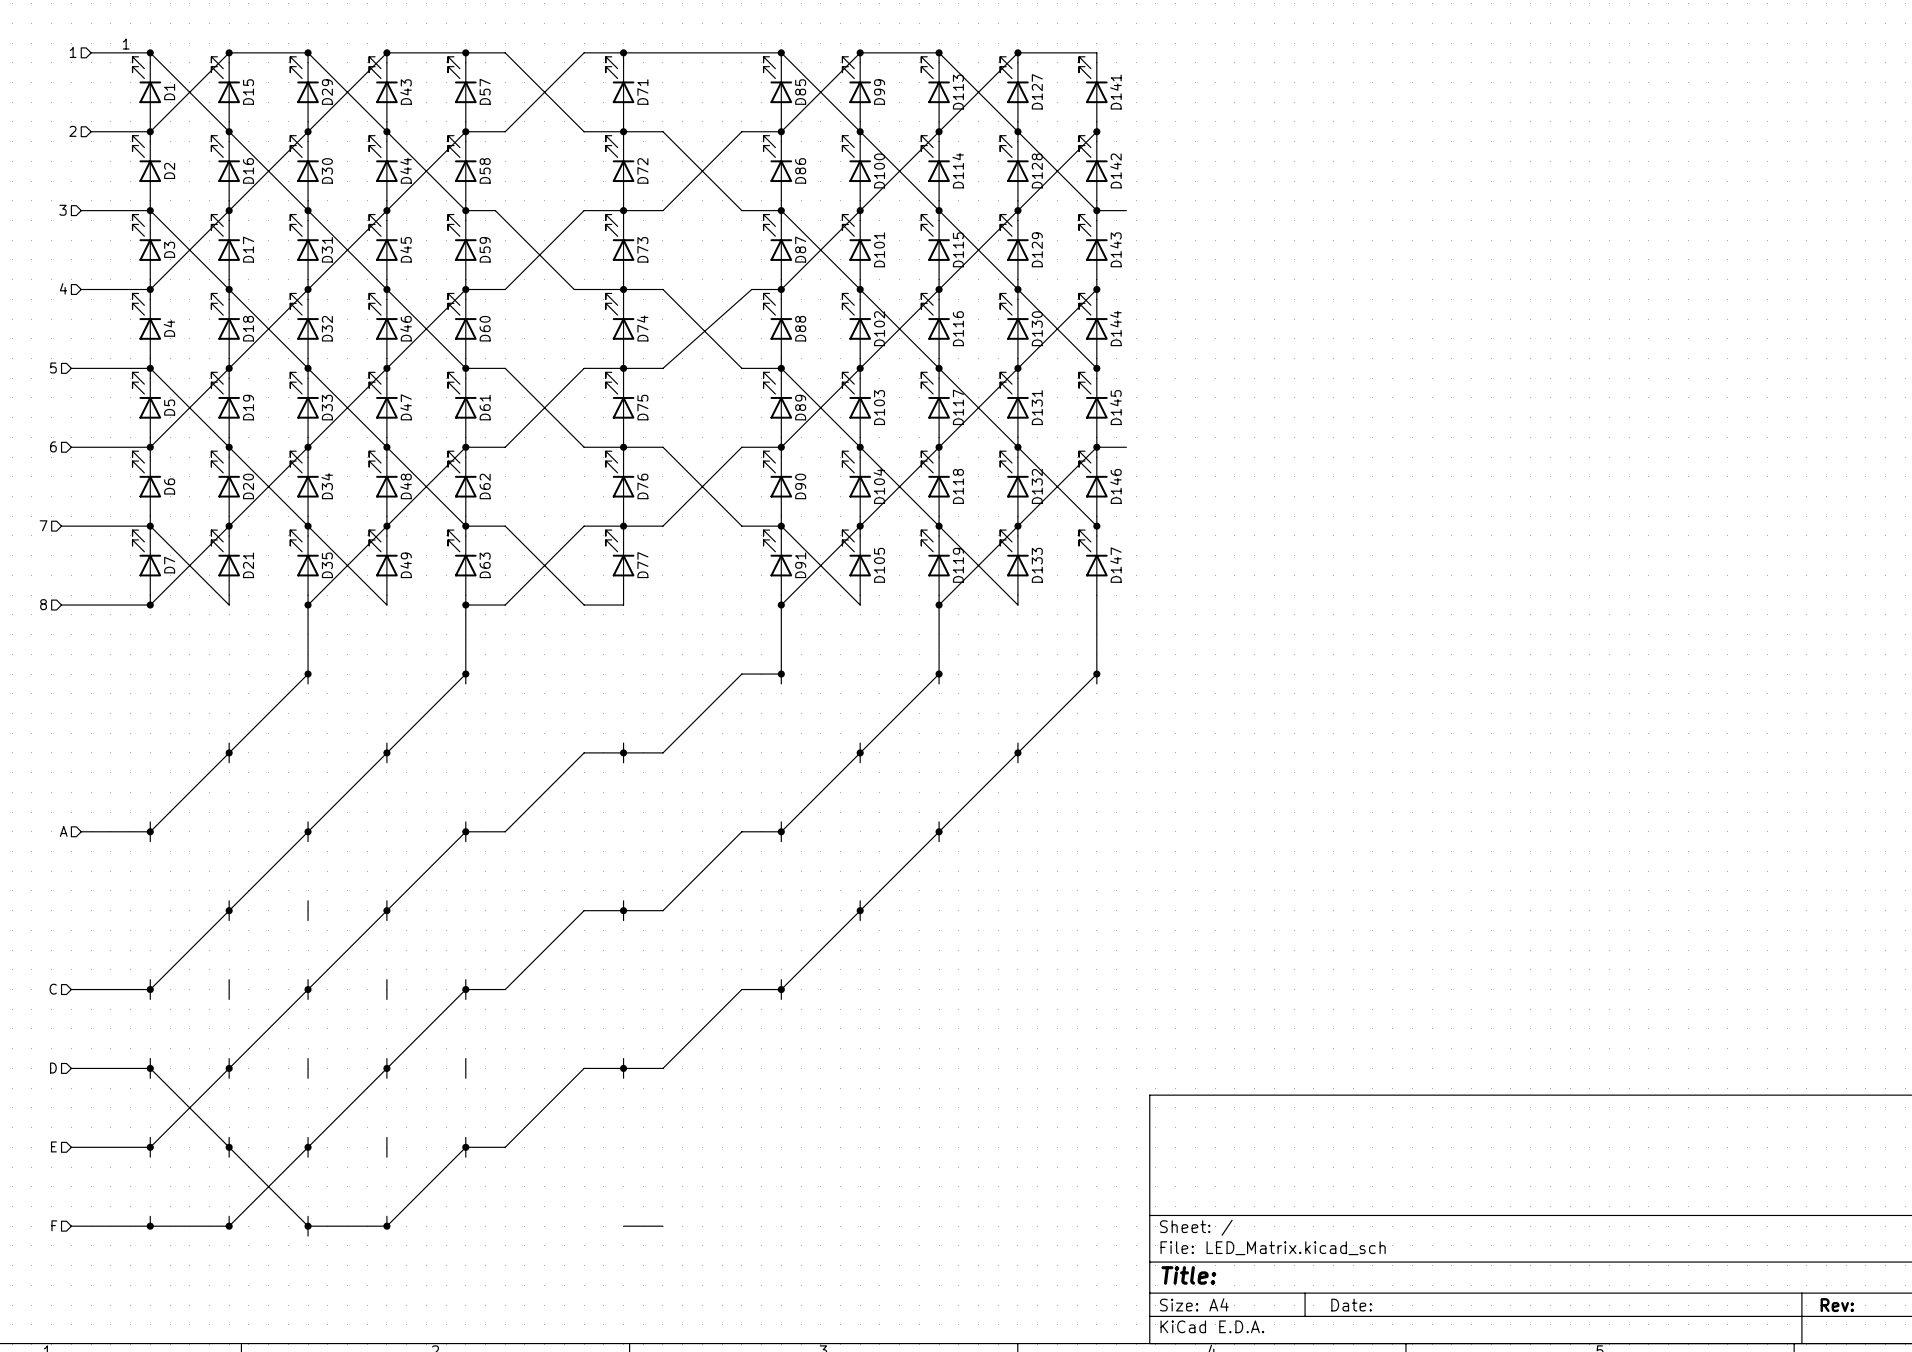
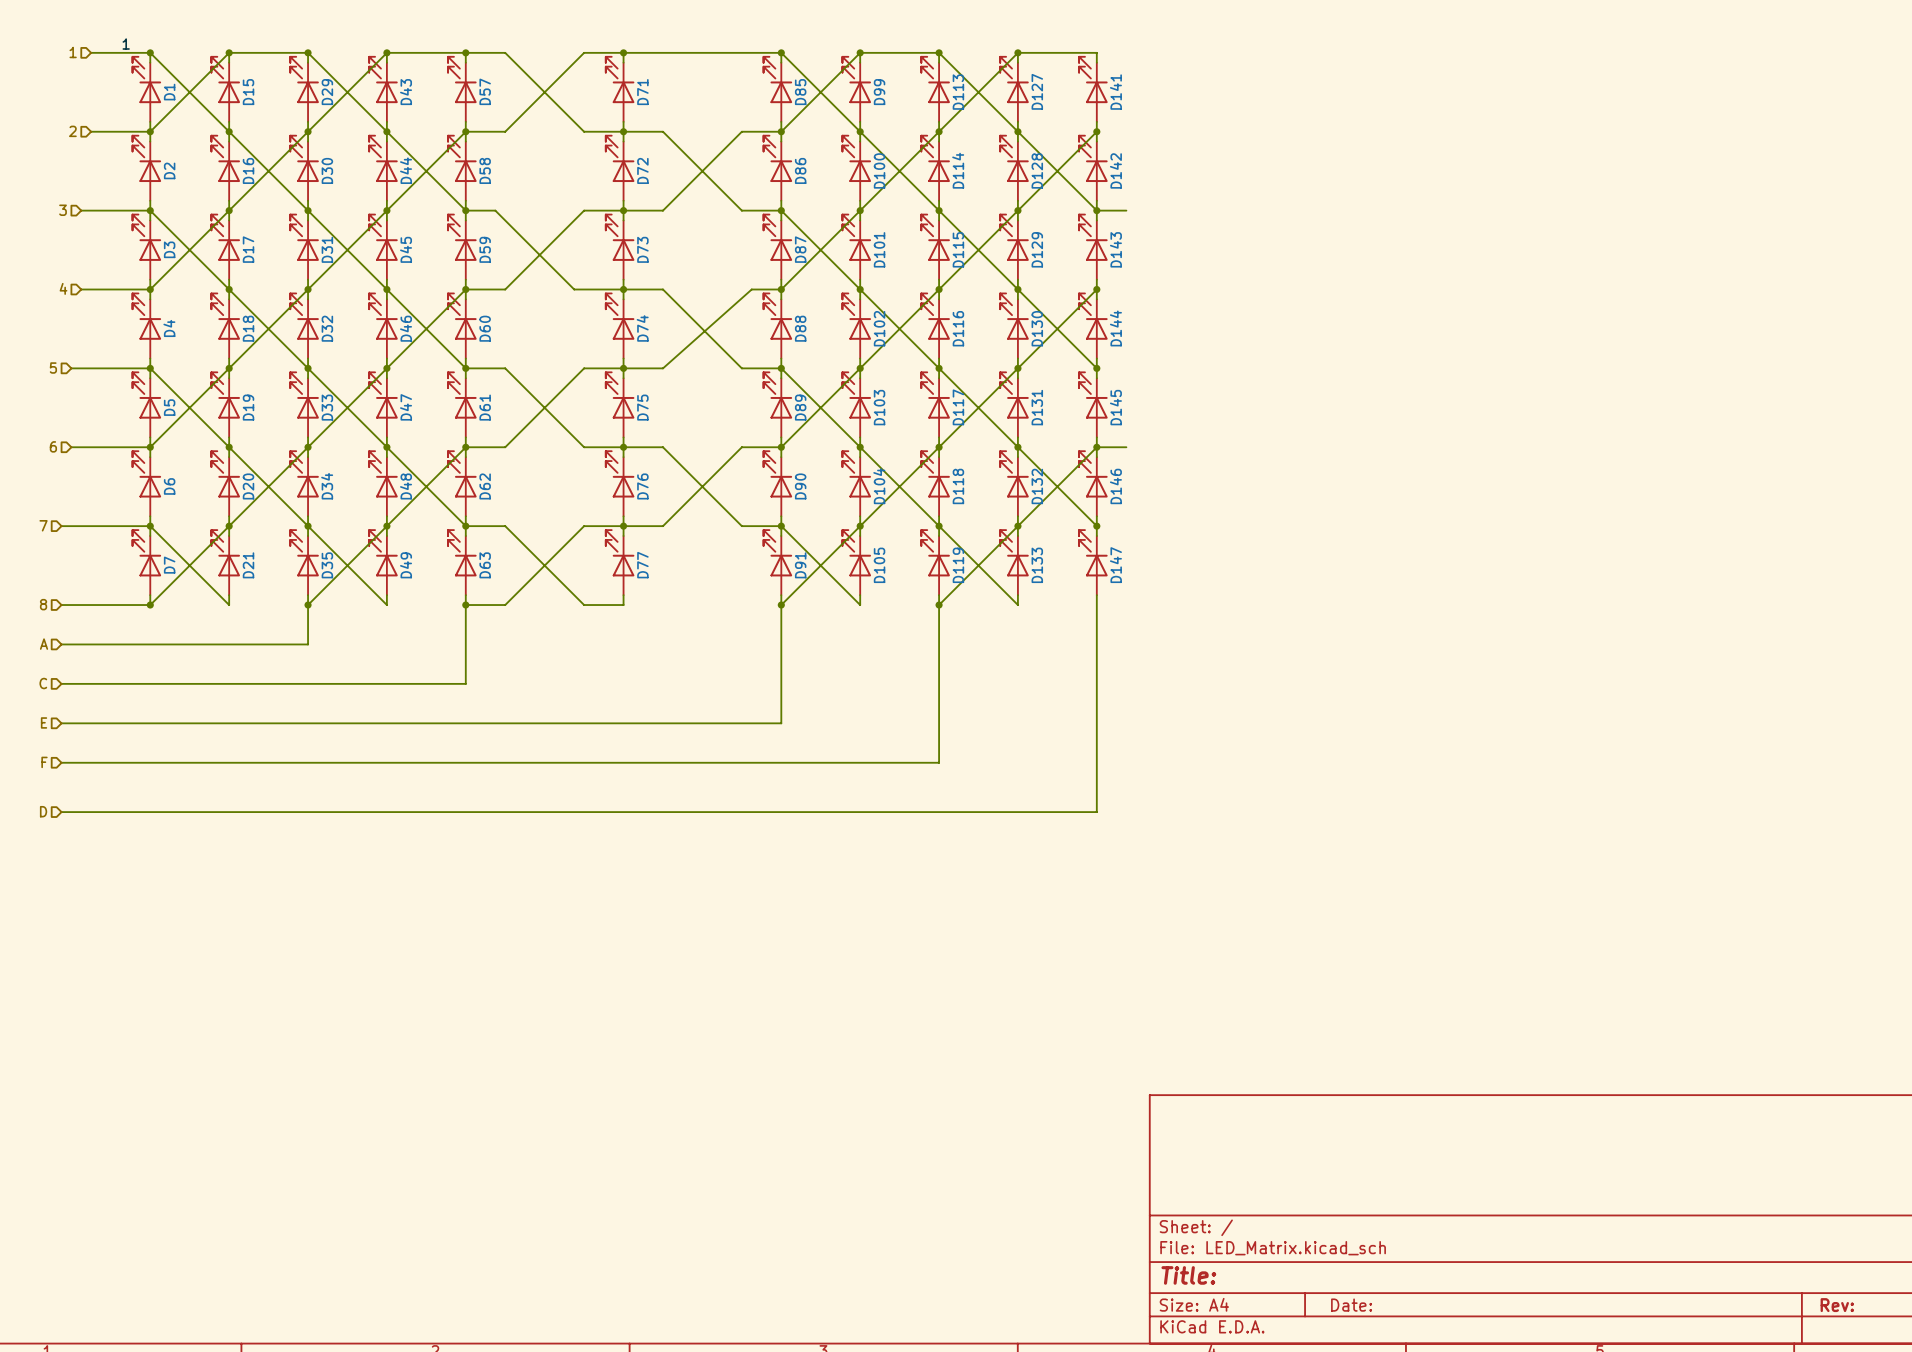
wire: (308, 644) (308, 683) -> (308, 644) (61, 644)
wire: (308, 674) (150, 831) (81, 831) -> none
junction: (308, 674) -> none
wire: (465, 674) (150, 989) (71, 989) -> none
junction: (465, 674) -> none
wire: (781, 674) (741, 674) (662, 752) (584, 752) (505, 831) (465, 831) (150, 1147) (71, 1147) -> none
junction: (781, 674) -> none
wire: (939, 674) (781, 831) (741, 831) (662, 910) (584, 910) (505, 989) (465, 989) (229, 1226) -> none
junction: (939, 674) -> none
wire: (1096, 674) (781, 989) (741, 989) (662, 1068) (584, 1068) (505, 1147) (465, 1147) (386, 1226) -> none
junction: (1096, 674) -> none
hierarchical label: none -> C (43, 683)
wire: none -> (61, 683) (465, 683)
wire: none -> (781, 683) (781, 723) (61, 723)
wire: none -> (939, 683) (939, 762) (61, 762)
wire: none -> (1096, 683) (1096, 812) (61, 812)
hierarchical label: none -> E (44, 722)
wire: (229, 743) (229, 762) -> none
wire: (386, 743) (386, 762) -> none
wire: (623, 743) (623, 762) -> none
wire: (860, 743) (860, 762) -> none
wire: (1017, 743) (1017, 762) -> none
junction: (229, 752) -> none
junction: (386, 752) -> none
junction: (623, 752) -> none
junction: (860, 752) -> none
junction: (1017, 752) -> none
hierarchical label: none -> F (44, 762)
hierarchical label: none -> D (43, 811)
wire: (150, 821) (150, 841) -> none
wire: (308, 821) (308, 841) -> none
wire: (465, 821) (465, 841) -> none
wire: (781, 821) (781, 841) -> none
wire: (939, 821) (939, 841) -> none
hierarchical label position: A (63, 831) -> A (44, 644)
junction: (150, 831) -> none
junction: (308, 831) -> none
junction: (465, 831) -> none
junction: (781, 831) -> none
junction: (939, 831) -> none
wire: (229, 900) (229, 920) -> none
wire: (308, 900) (308, 920) -> none
wire: (386, 900) (386, 920) -> none
wire: (623, 900) (623, 920) -> none
wire: (860, 900) (860, 920) -> none
junction: (229, 910) -> none
junction: (386, 910) -> none
junction: (623, 910) -> none
junction: (860, 910) -> none
wire: (150, 979) (150, 999) -> none
wire: (229, 979) (229, 999) -> none
wire: (308, 979) (308, 999) -> none
wire: (386, 979) (386, 999) -> none
wire: (465, 979) (465, 999) -> none
wire: (781, 979) (781, 999) -> none
hierarchical label: C (53, 989) -> none
junction: (150, 989) -> none
junction: (308, 989) -> none
junction: (465, 989) -> none
junction: (781, 989) -> none
wire: (150, 1058) (150, 1078) -> none
wire: (229, 1058) (229, 1078) -> none
wire: (308, 1058) (308, 1078) -> none
wire: (386, 1058) (386, 1078) -> none
wire: (465, 1058) (465, 1078) -> none
wire: (623, 1058) (623, 1078) -> none
hierarchical label: D (53, 1068) -> none
wire: (71, 1068) (150, 1068) (308, 1226) (386, 1226) -> none
junction: (150, 1068) -> none
junction: (229, 1068) -> none
junction: (386, 1068) -> none
junction: (623, 1068) -> none
wire: (150, 1137) (150, 1157) -> none
wire: (229, 1137) (229, 1157) -> none
wire: (308, 1137) (308, 1157) -> none
wire: (386, 1137) (386, 1157) -> none
wire: (465, 1137) (465, 1157) -> none
hierarchical label: E (53, 1146) -> none
junction: (150, 1147) -> none
junction: (229, 1147) -> none
junction: (308, 1147) -> none
junction: (465, 1147) -> none
wire: (150, 1216) (150, 1226) -> none
wire: (229, 1216) (229, 1226) -> none
wire: (308, 1216) (308, 1236) -> none
wire: (386, 1216) (386, 1226) -> none
hierarchical label: F (54, 1225) -> none
wire: (71, 1226) (229, 1226) -> none
junction: (150, 1226) -> none
junction: (229, 1226) -> none
junction: (308, 1226) -> none
junction: (386, 1226) -> none
wire: (623, 1226) (662, 1226) -> none

